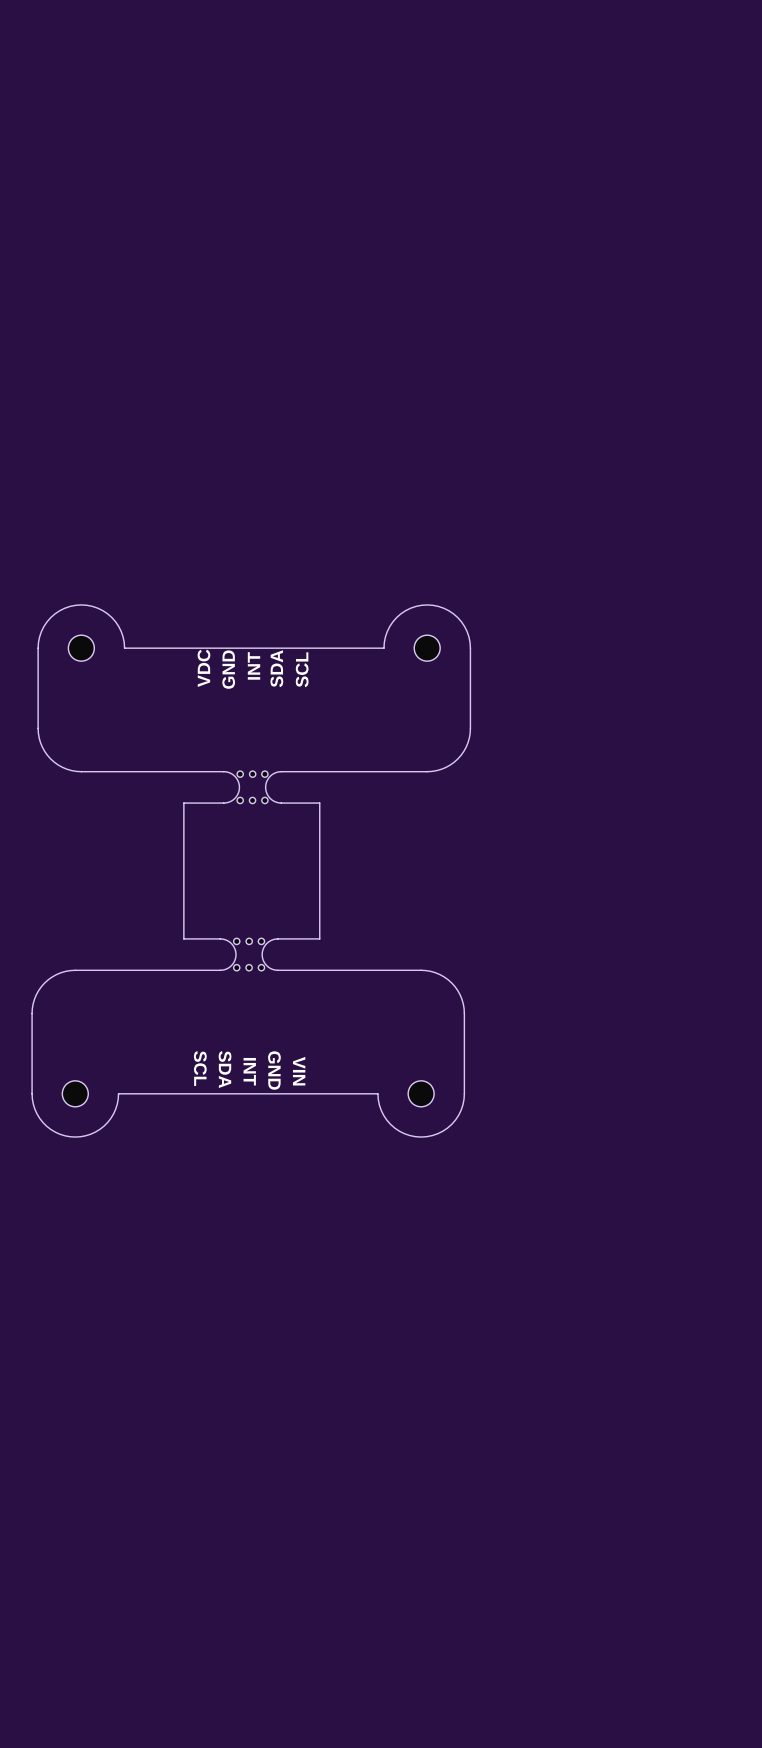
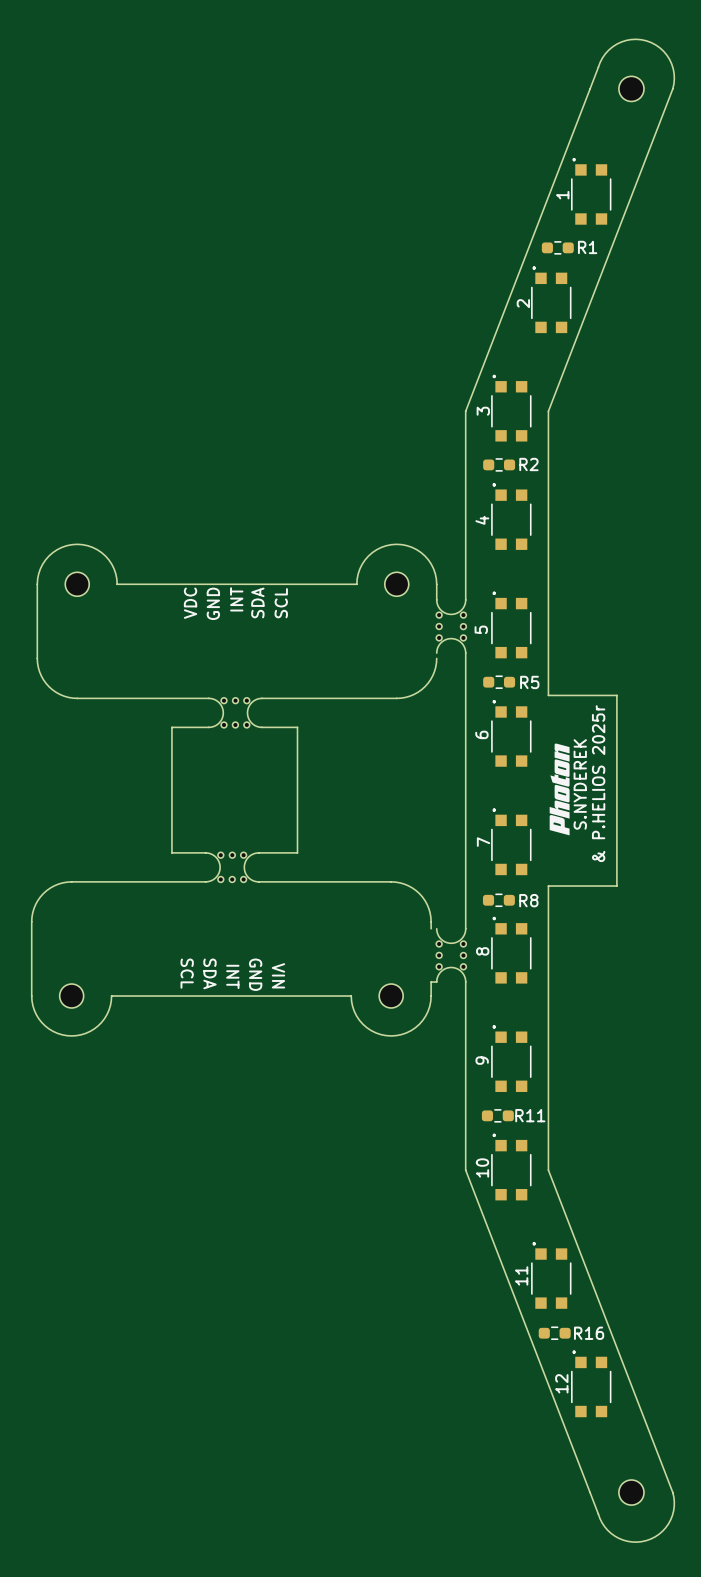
part: none -> (631, 88)
part: none -> (591, 191)
text: none -> 1 (562, 195)
R1: none -> (557, 247)
part: none -> (551, 299)
text: none -> 2 (523, 303)
part: none -> (511, 408)
text: none -> 3 (483, 411)
R2: none -> (499, 464)
part: none -> (511, 516)
text: none -> 4 (482, 520)
board edge: (470, 648) (470, 728) -> (436, 584) (436, 599)
board edge: none -> (465, 599) (465, 411) (600, 62) (608, 50) (616, 44) (631, 39) (646, 40) (659, 47) (669, 59) (674, 73) (672, 88) (548, 411) (548, 695) (616, 695) (616, 886) (548, 886) (548, 1170) (672, 1492) (673, 1511) (668, 1524) (658, 1534) (646, 1540) (632, 1542) (619, 1538) (607, 1530) (599, 1518) (465, 1170) (465, 981)
part: none -> (511, 624)
part: none -> (451, 626)
text: none -> 5 (481, 629)
board edge: none -> (465, 653) (465, 928)
R5: none -> (499, 682)
part: none -> (511, 733)
text: none -> 6 (481, 734)
drawing: none -> [549, 743, 570, 836]
text: none -> S.NYDEREK (580, 784)
text: none -> & P.HELIOS 2025r (598, 783)
part: none -> (511, 841)
text: none -> 7 (483, 842)
R8: none -> (498, 900)
board edge: (464, 1021) (464, 1078) -> (436, 981) (431, 982)
part: none -> (511, 950)
text: none -> 8 (482, 951)
part: none -> (451, 955)
part: none -> (511, 1058)
text: none -> 9 (482, 1060)
R11: none -> (497, 1115)
part: none -> (511, 1167)
text: none -> 10 (482, 1167)
text: none -> 11 (521, 1275)
part: none -> (551, 1275)
R16: none -> (554, 1333)
text: none -> 12 (561, 1383)
part: none -> (591, 1383)
part: none -> (631, 1492)

